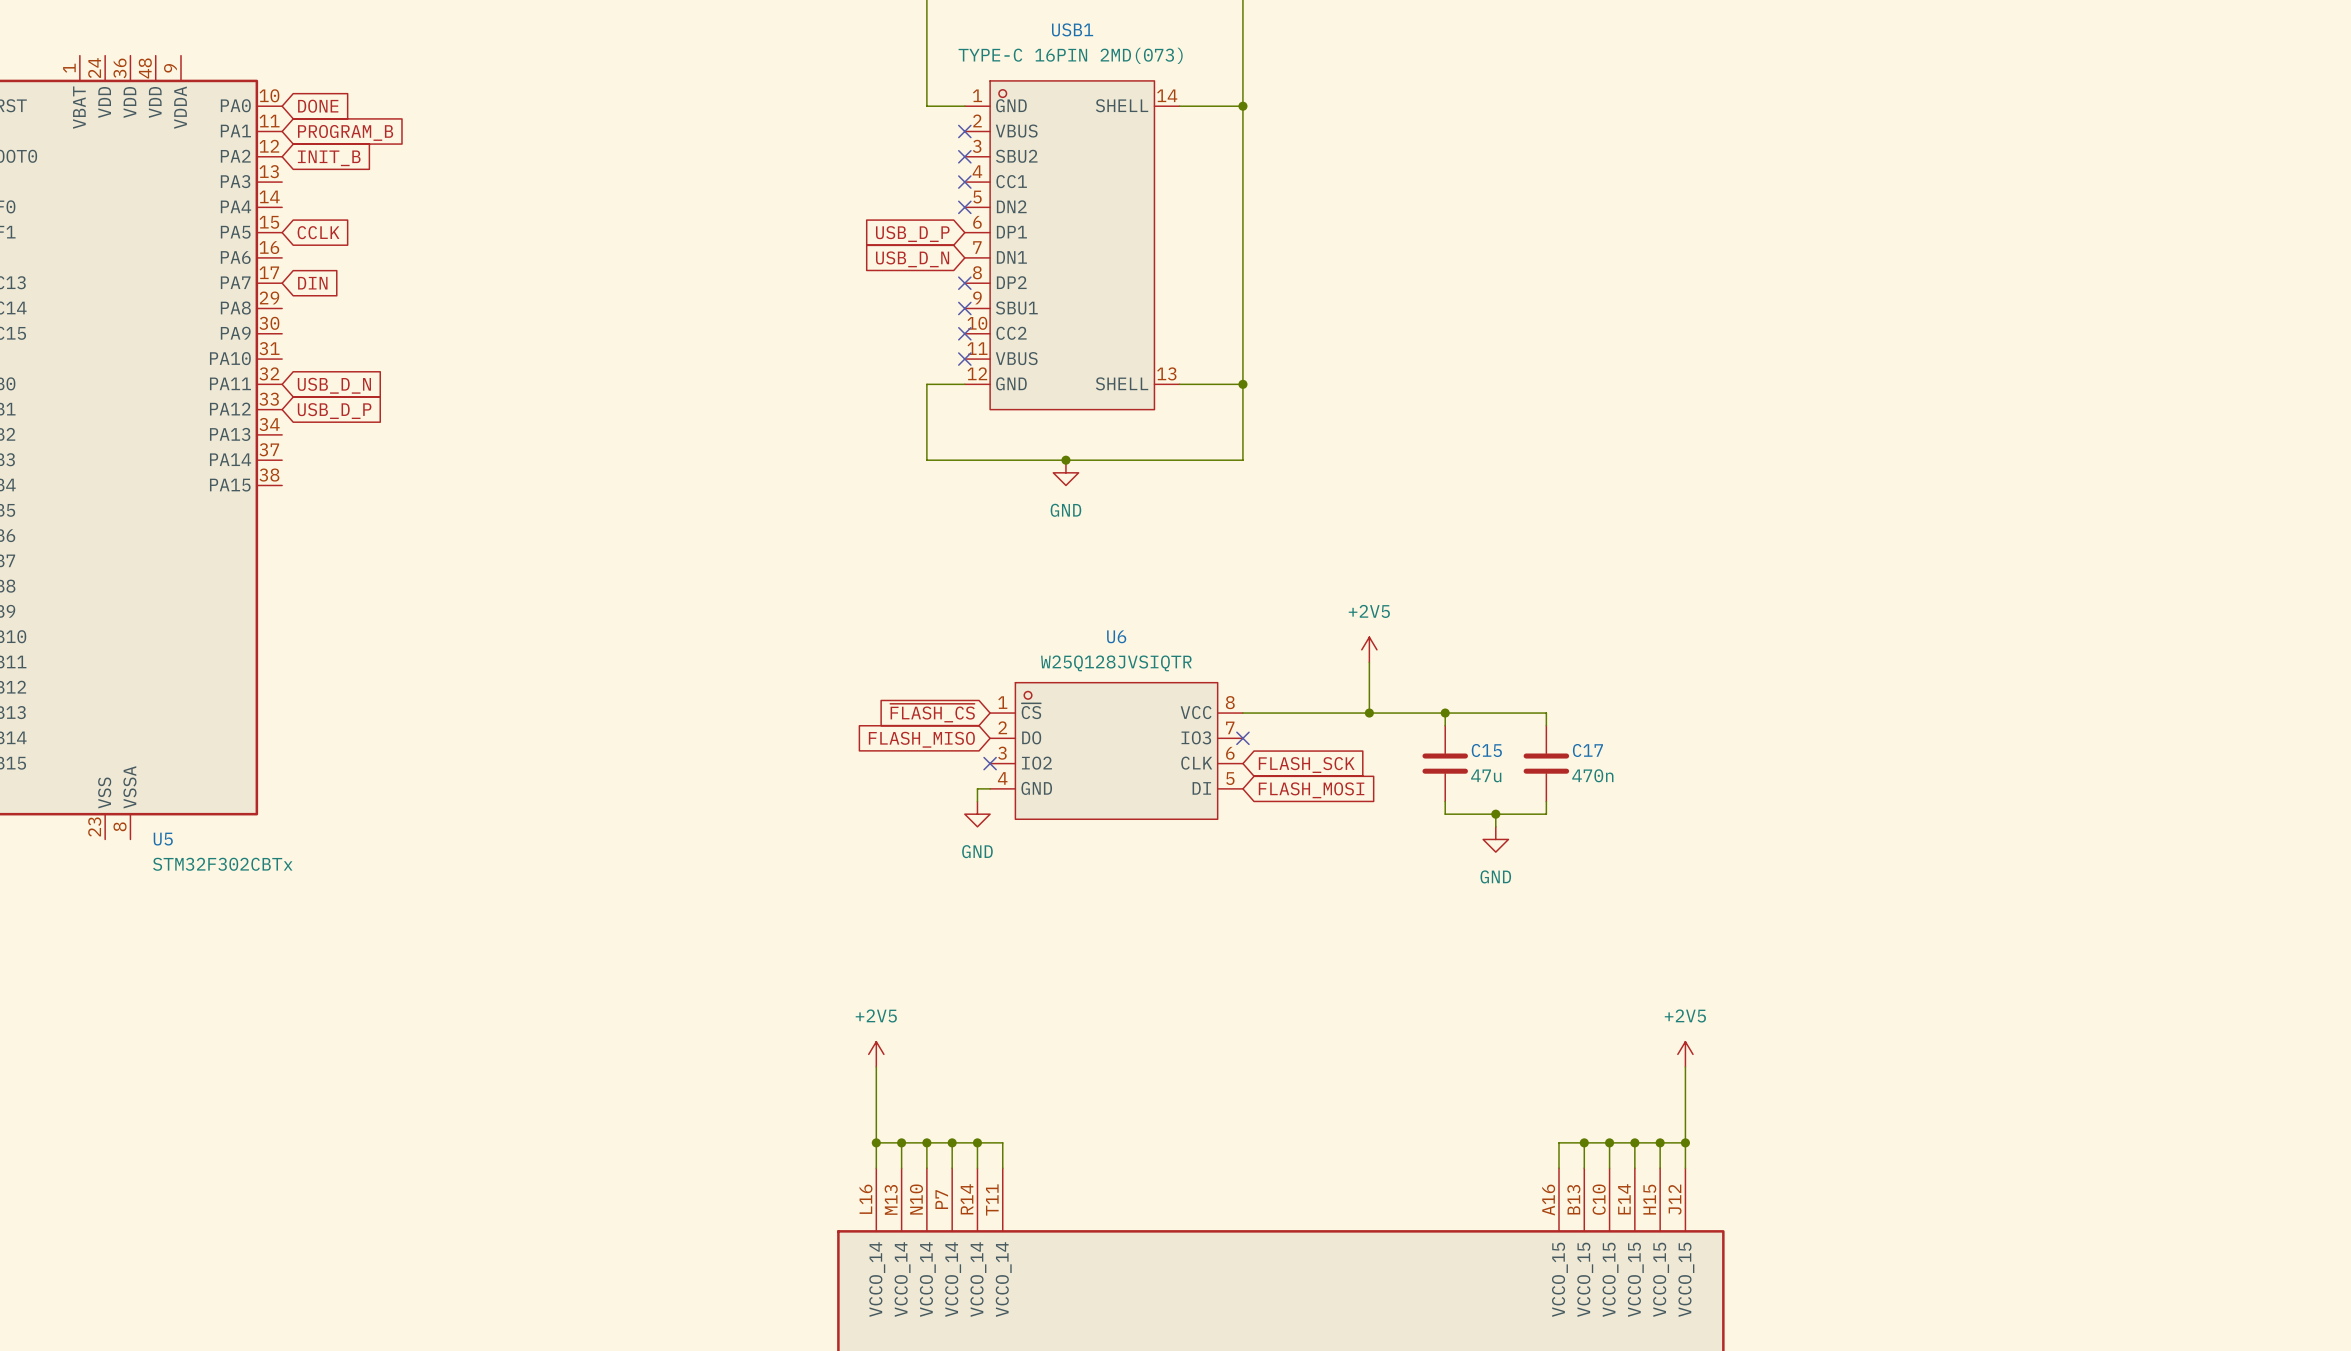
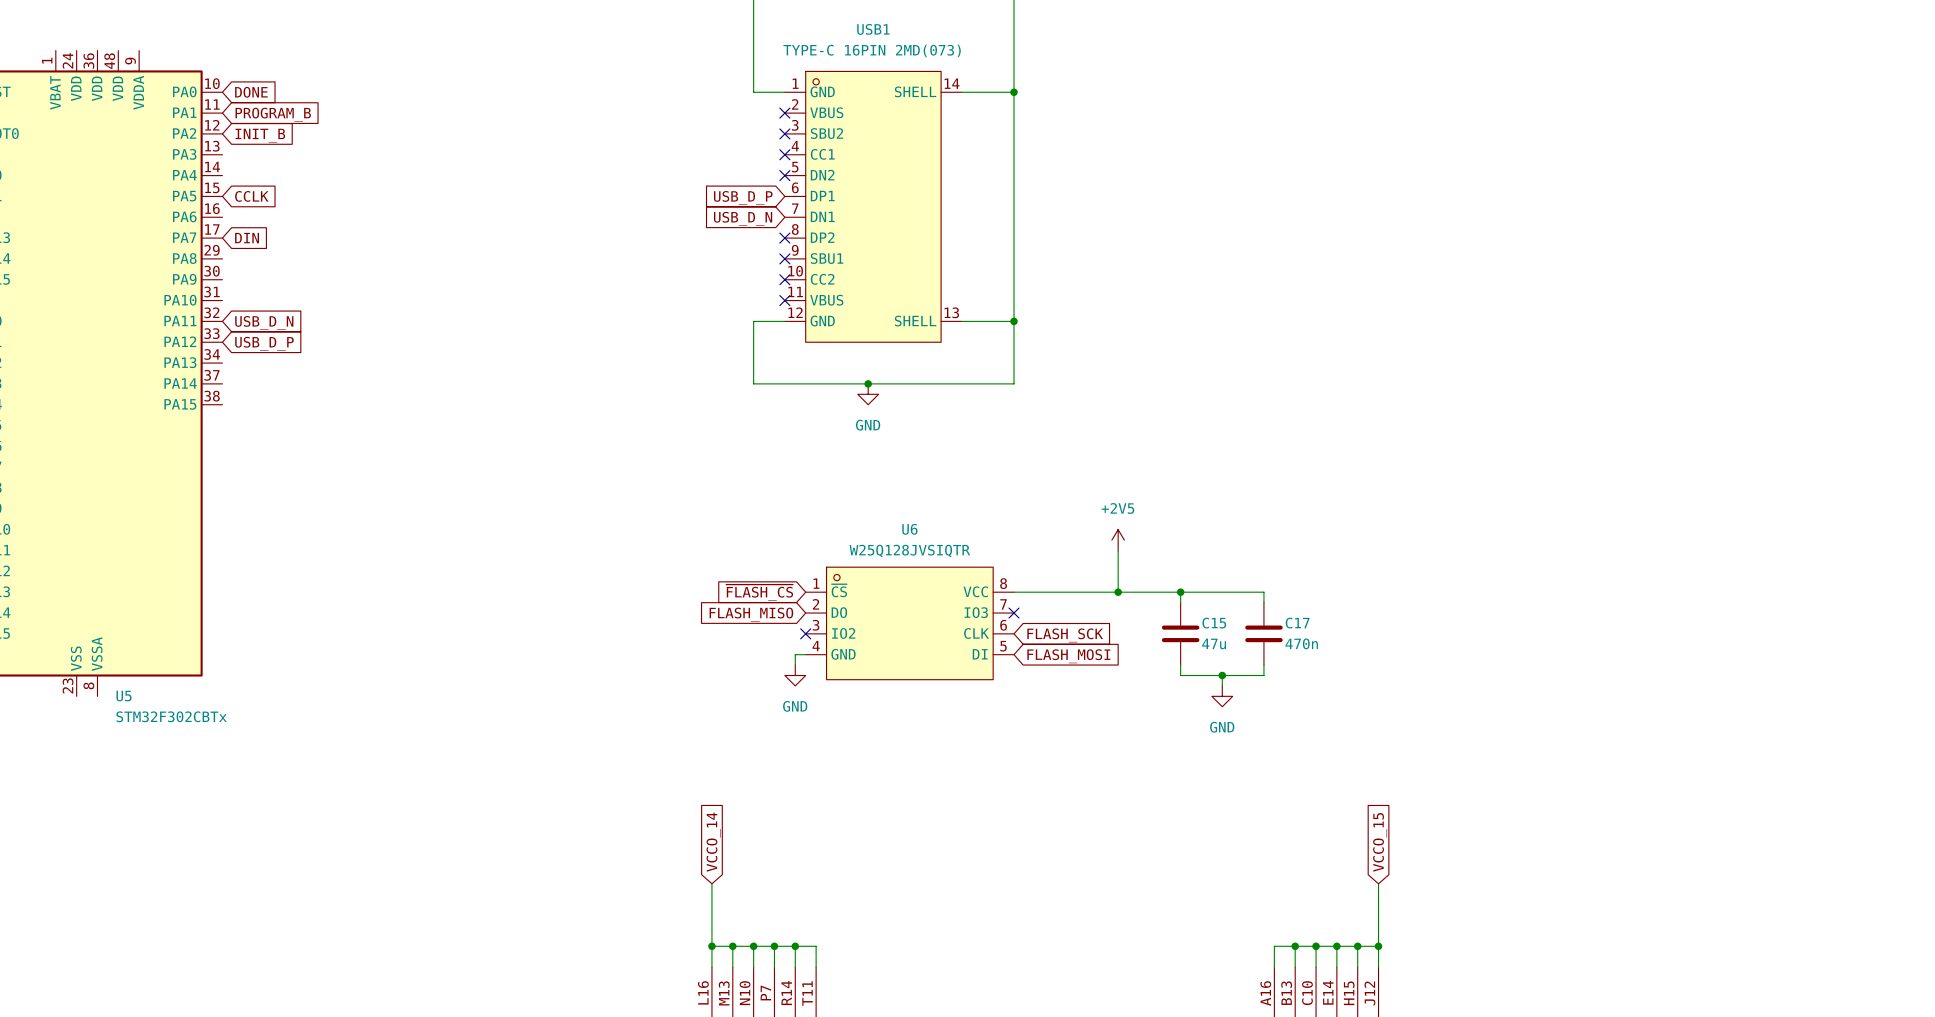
global label: none -> VCCO_14 (713, 842)
global label: none -> VCCO_15 (1380, 842)
power symbol: +2V5 (876, 1054) -> none
power symbol: +2V5 (1685, 1054) -> none

